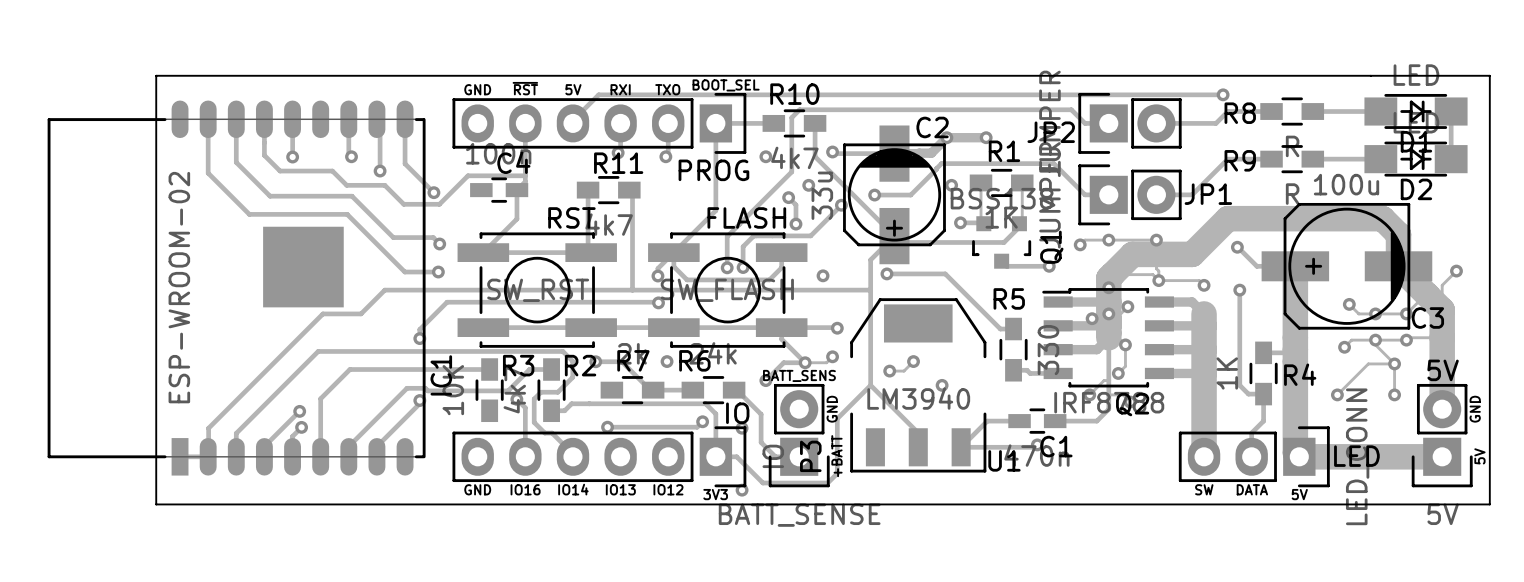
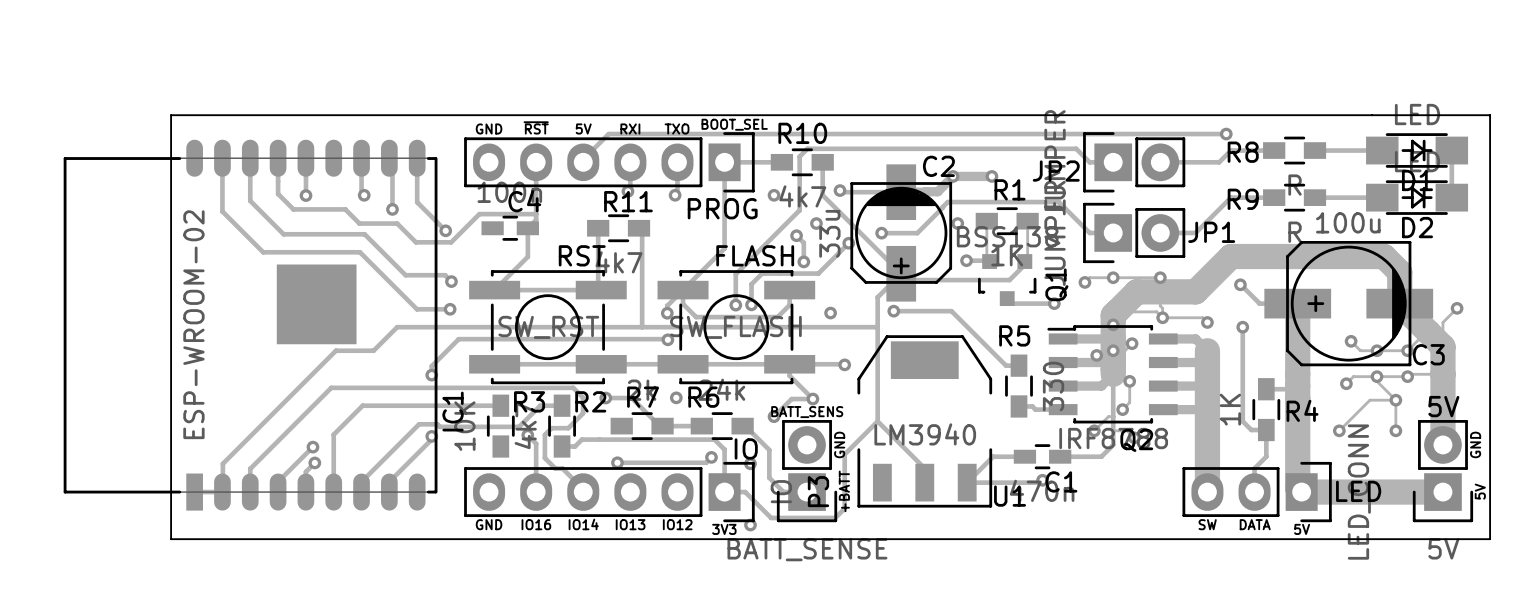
track: (832, 356) (826, 362) (805, 362) -> none
via: (832, 356) -> none
track: (913, 361) (903, 371) (889, 371) -> none
via: (913, 361) -> none
via: (889, 371) -> none
via: (942, 385) -> none

